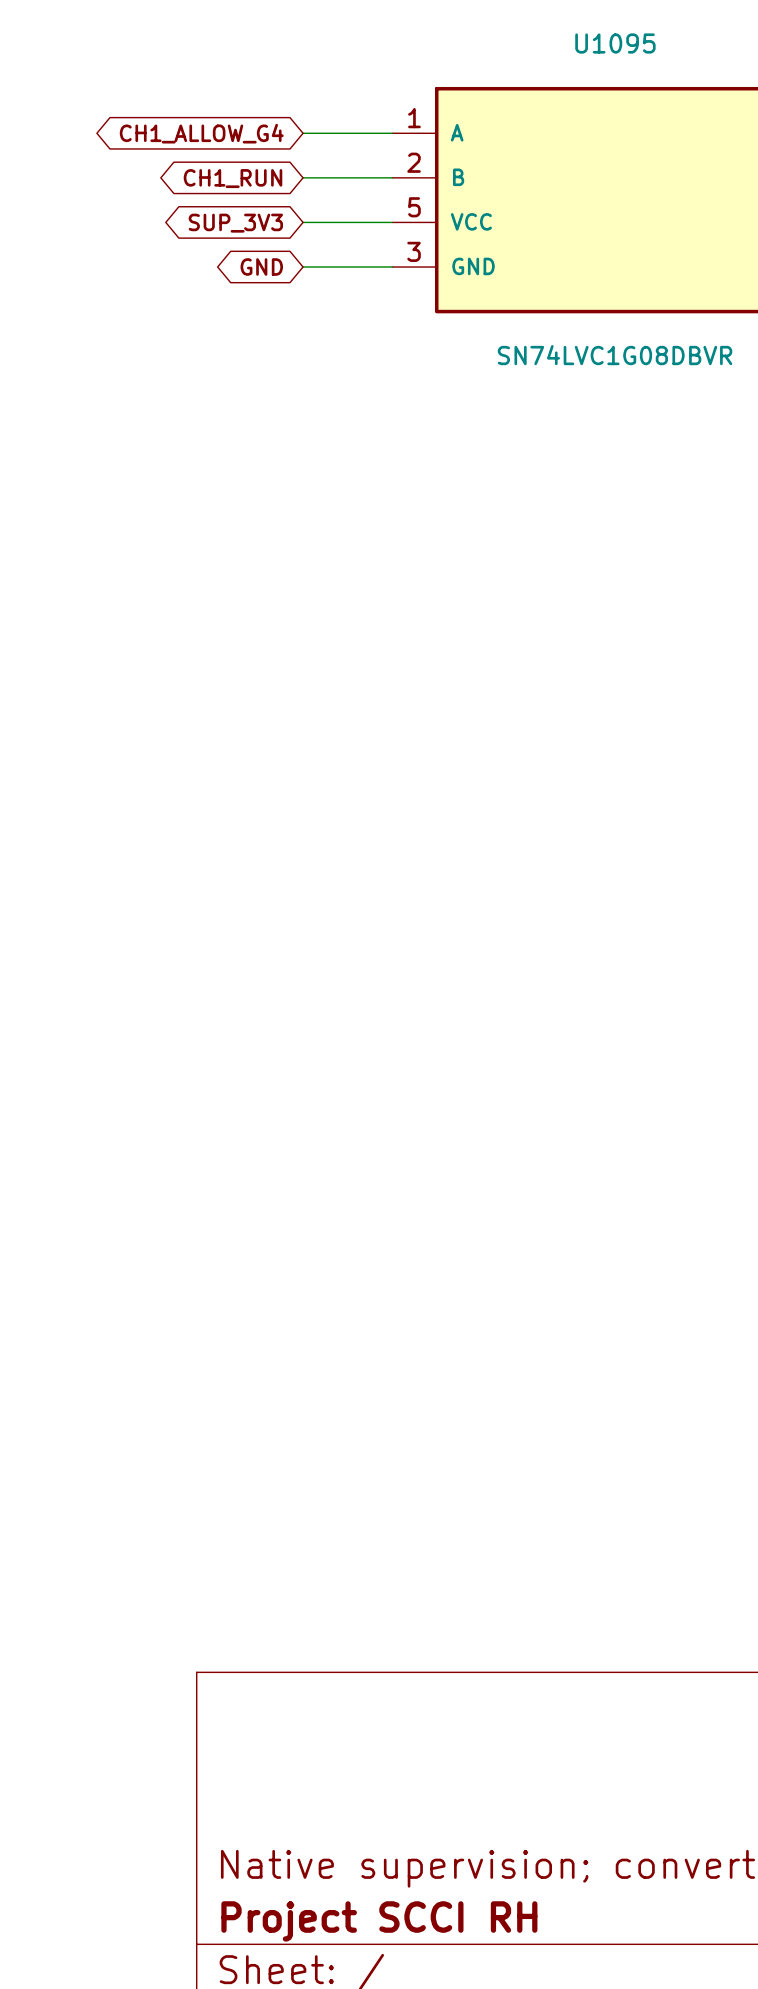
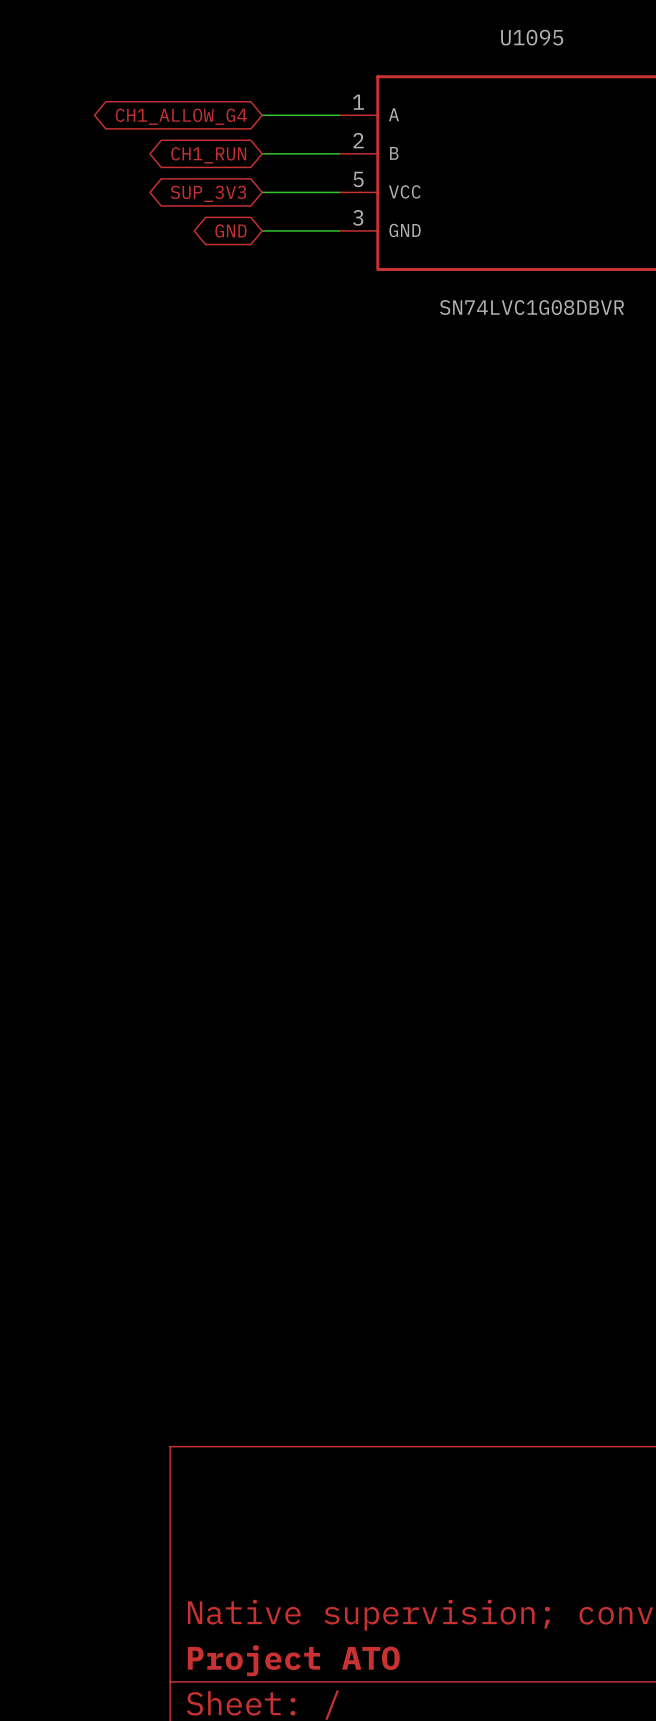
title block: Project SCCI RH (379, 1921) -> Project ATO (293, 1660)

